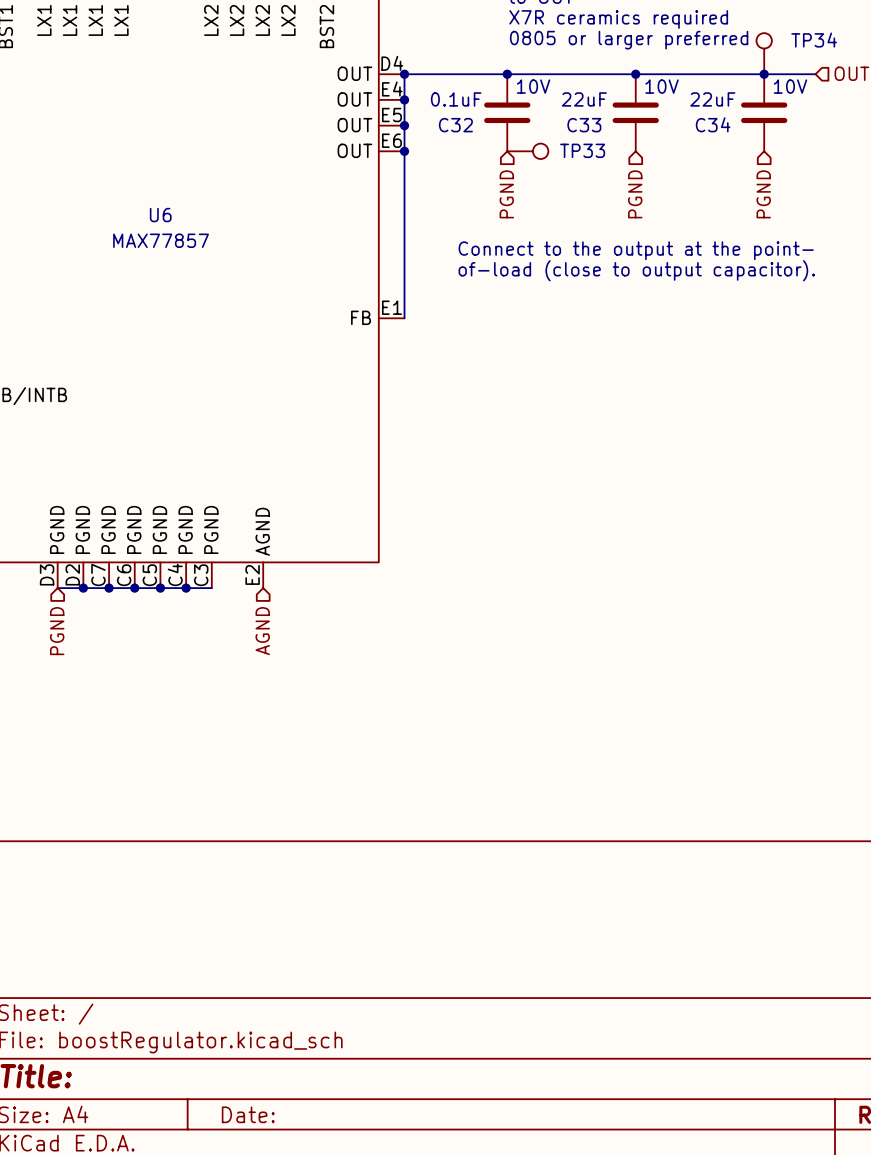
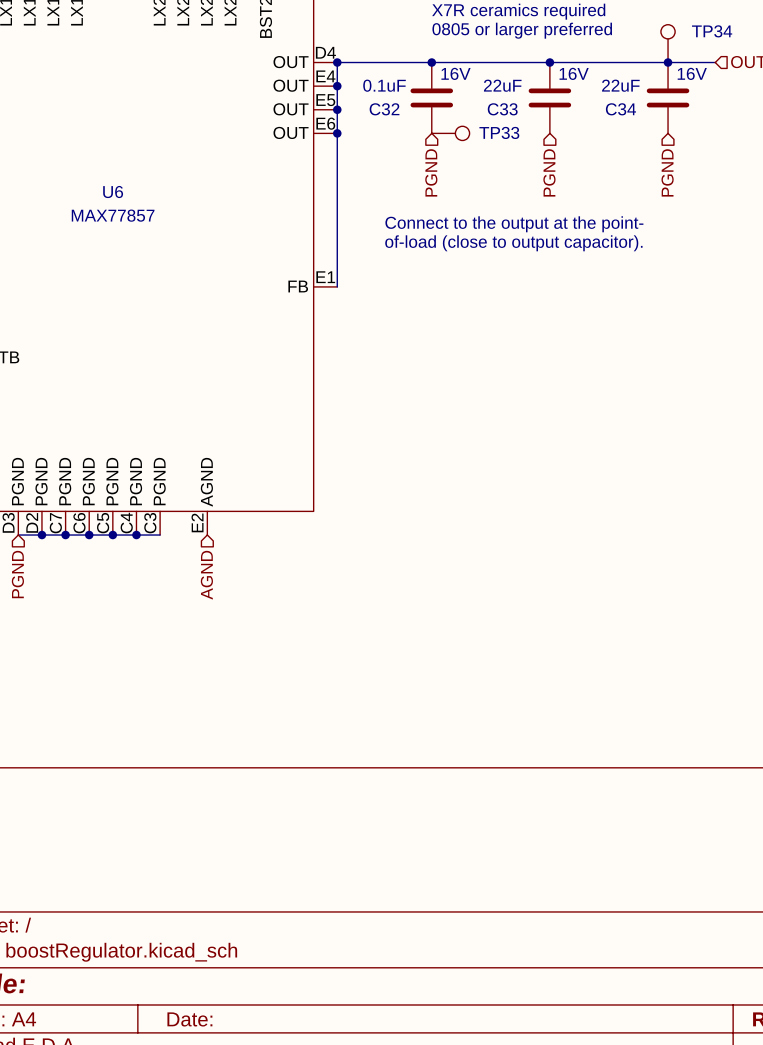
C32 text: 10V (533, 86) -> 16V (456, 73)
C33 text: 10V (662, 86) -> 16V (574, 73)
C34 text: 10V (790, 86) -> 16V (692, 73)

